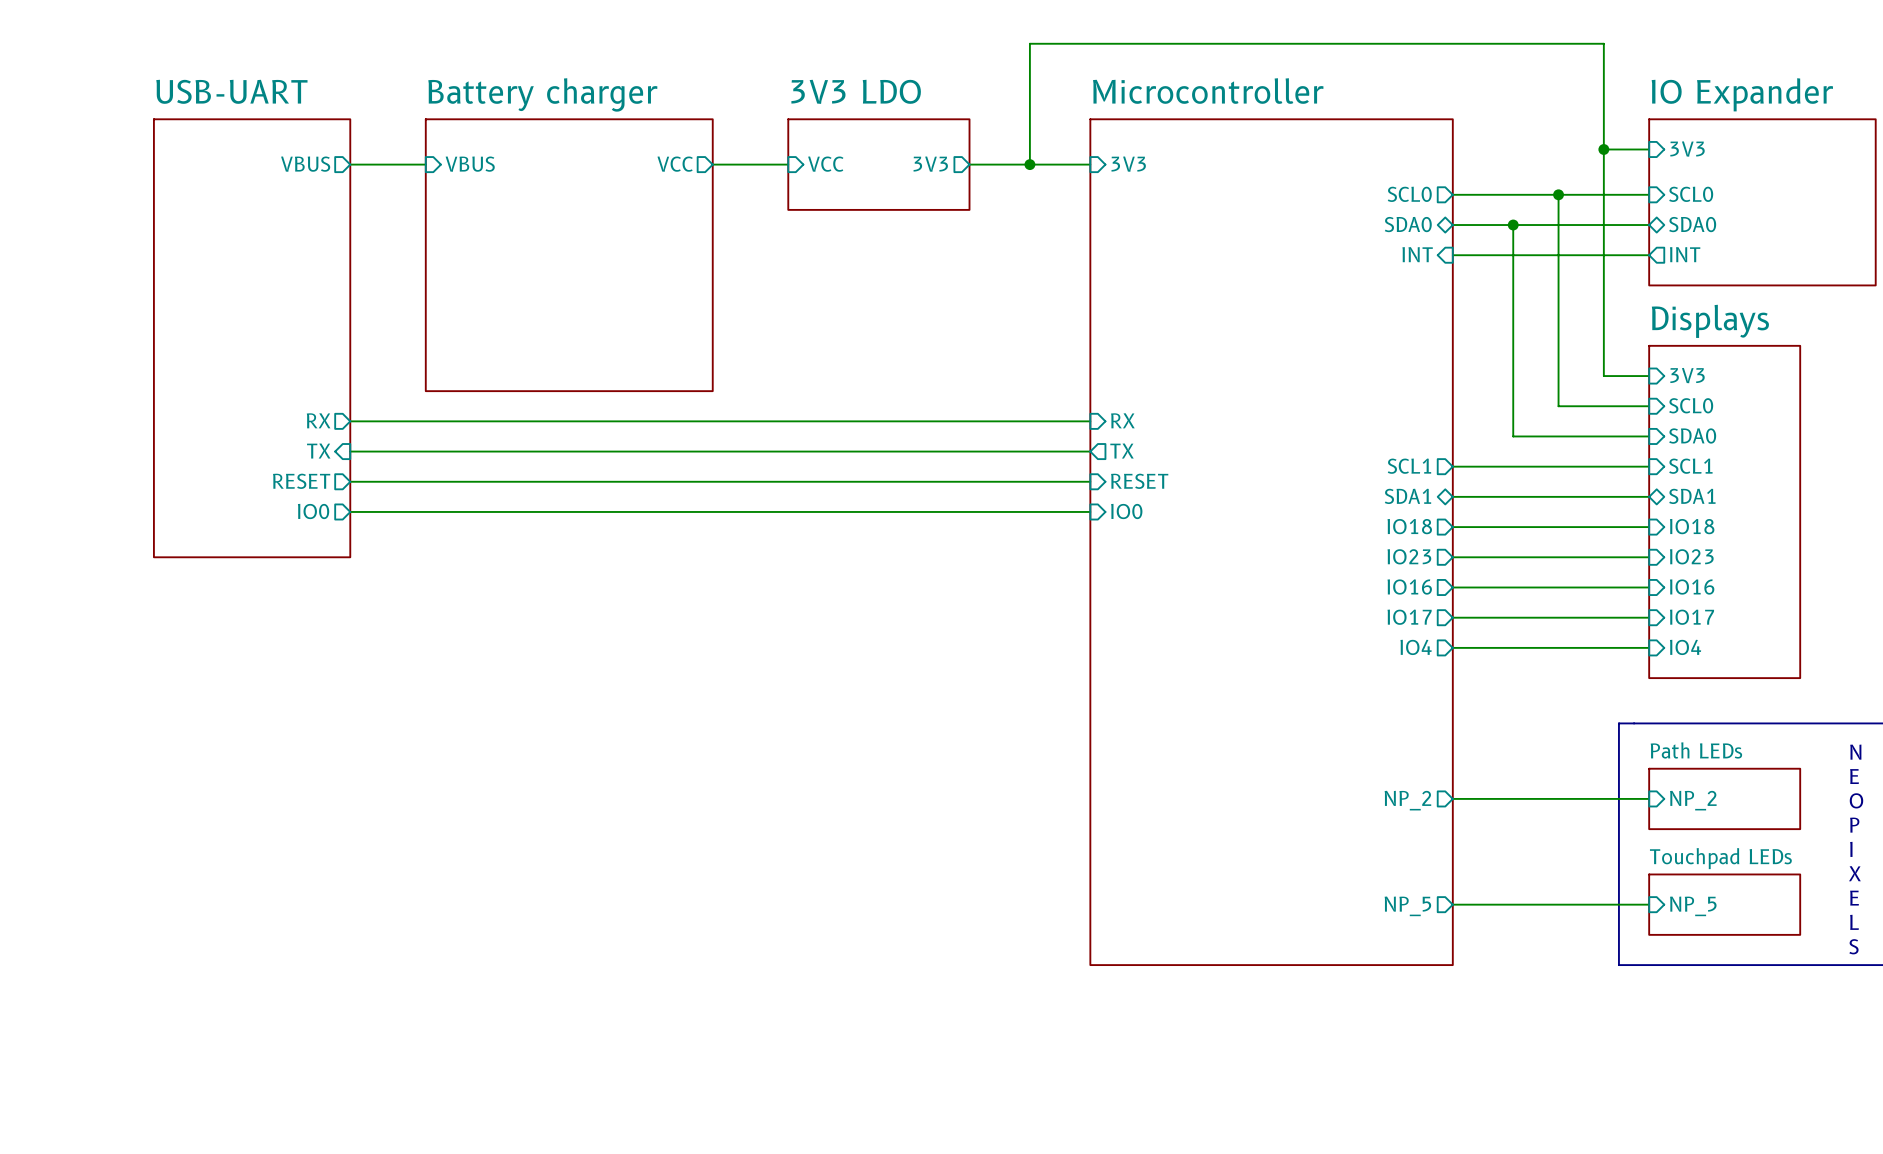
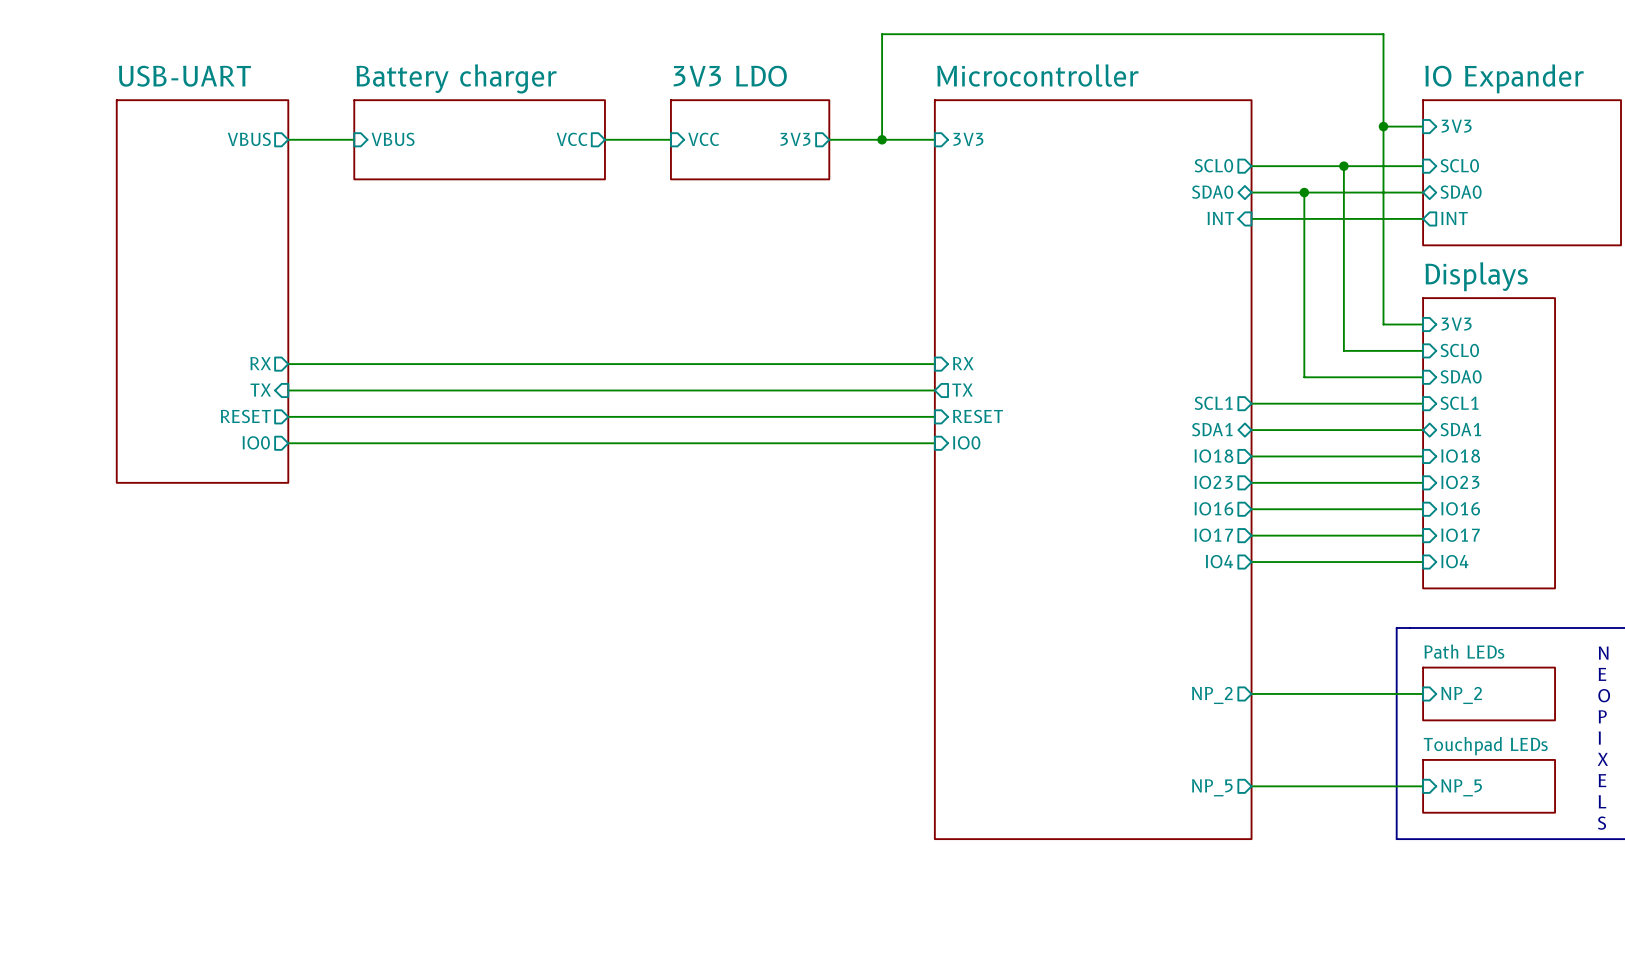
sheet Battery charger: none -> (479, 139)
sheet Battery charger: (569, 255) -> none

